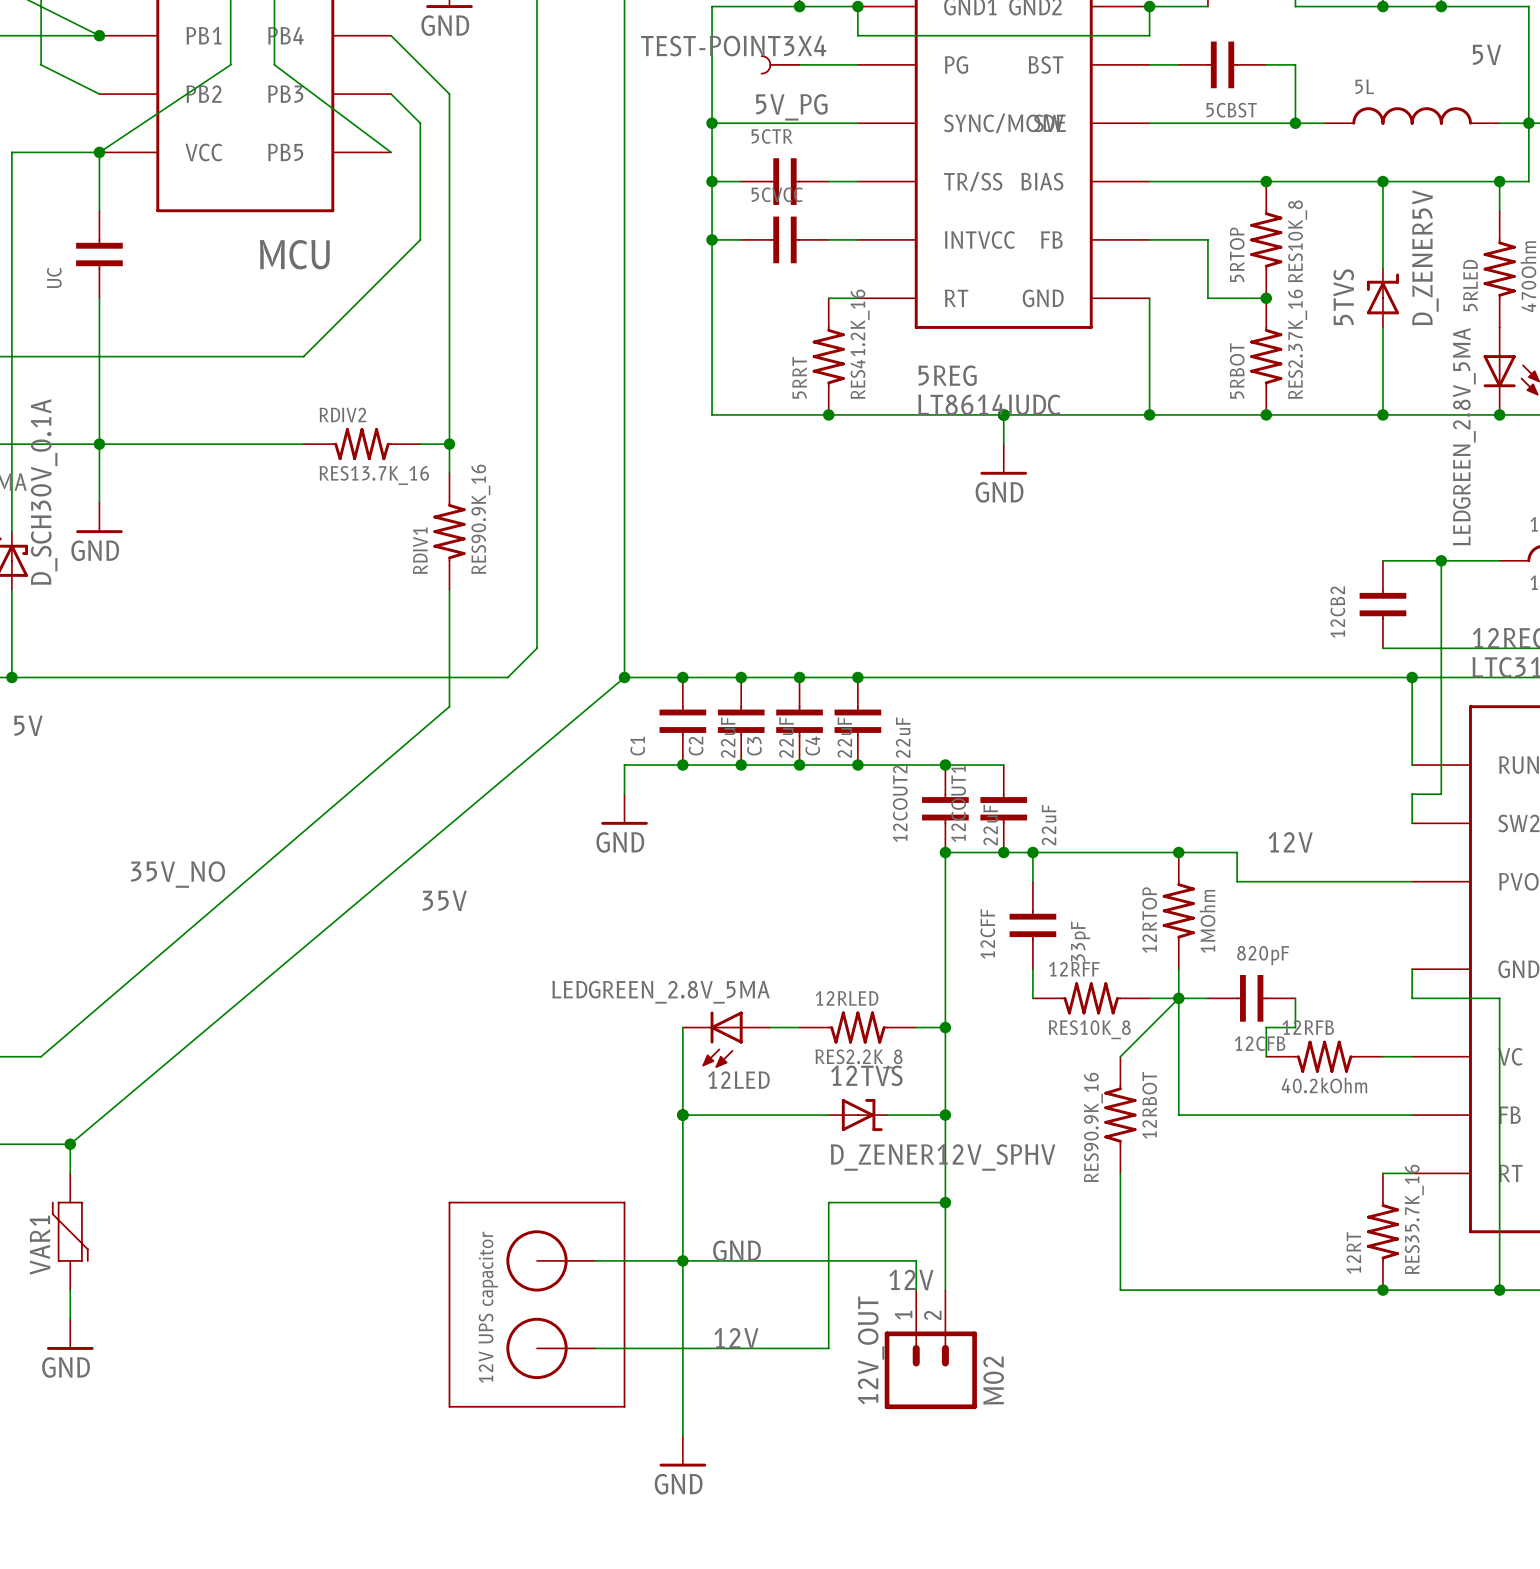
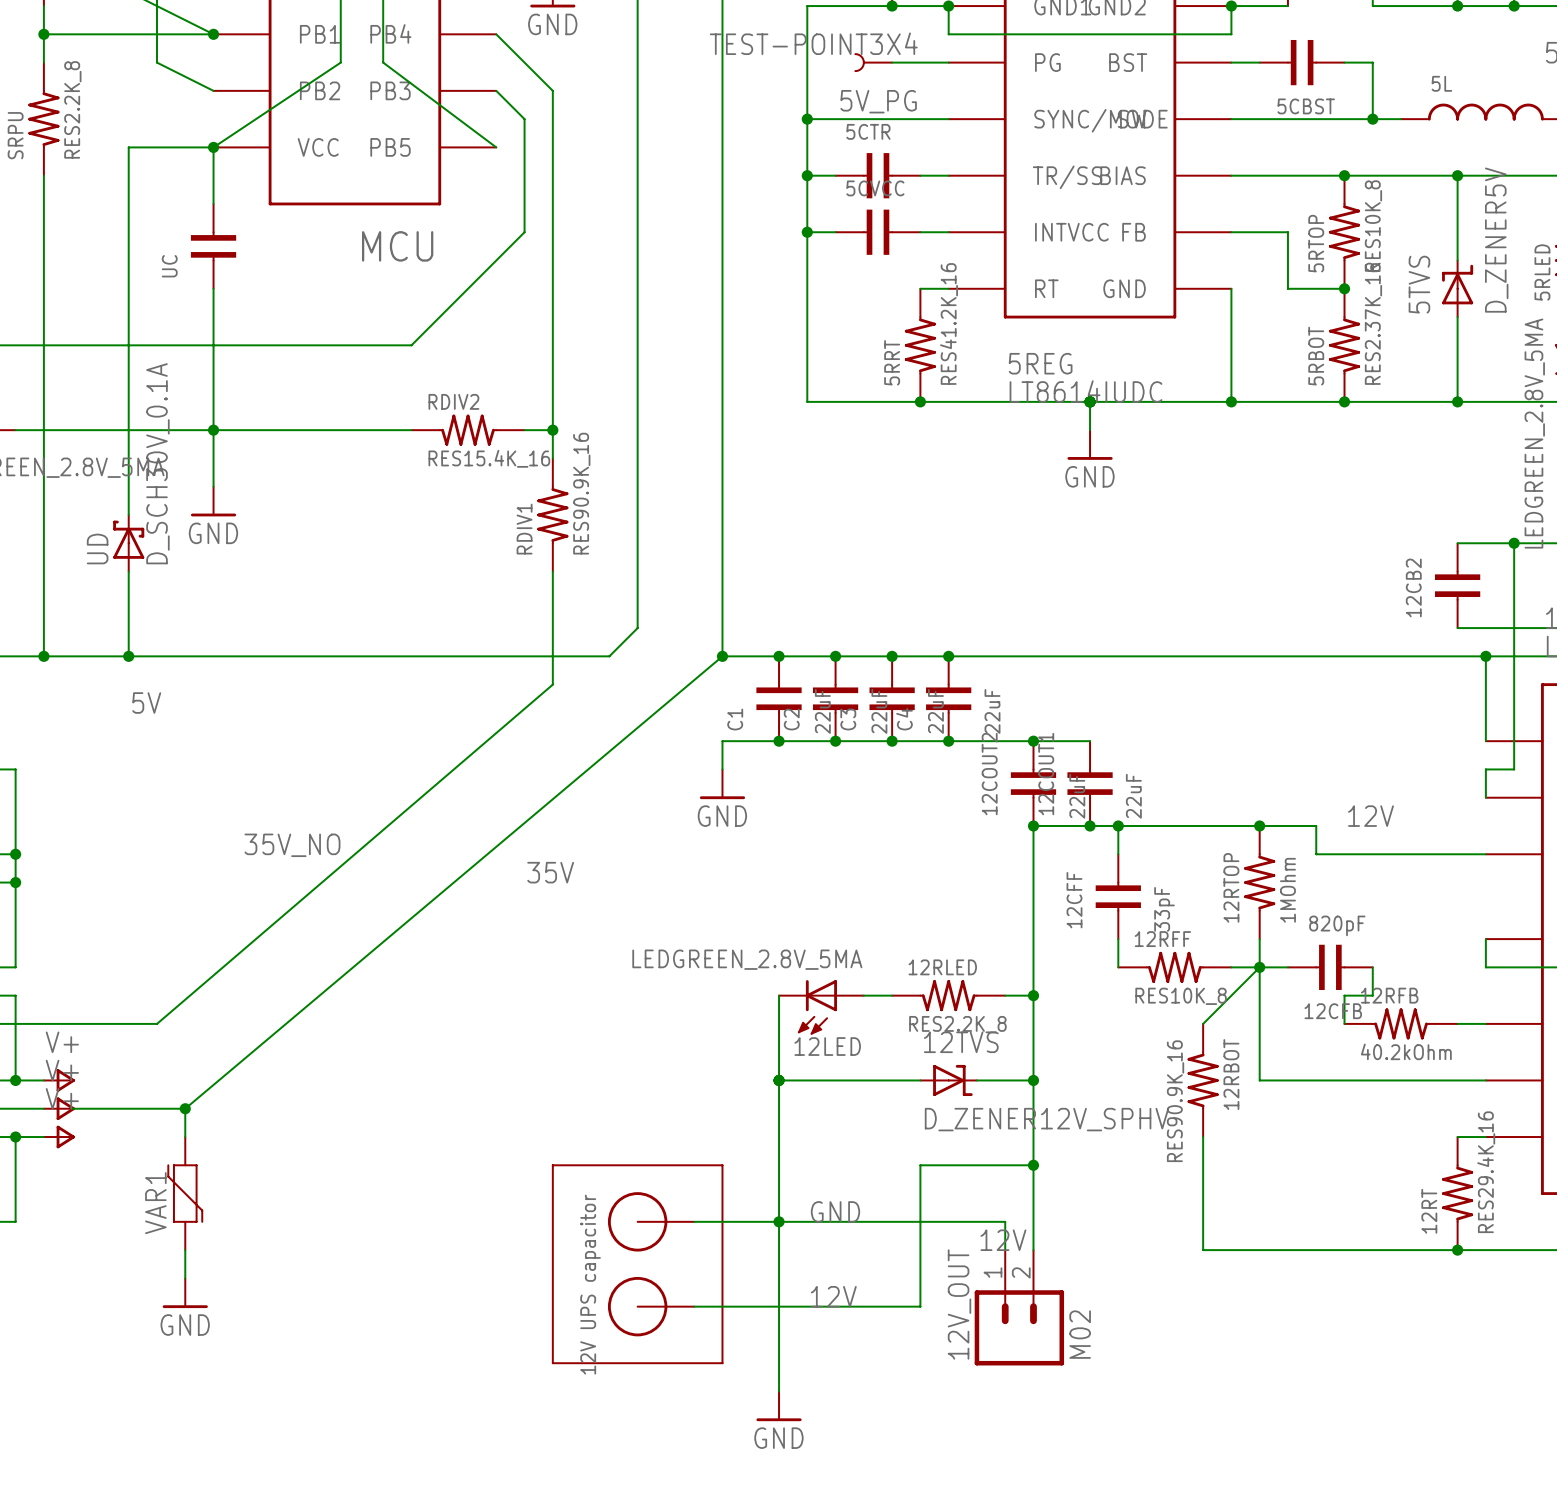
RDIV2 value: RES13.7K_16 (374, 475) -> RES15.4K_16 (489, 458)
12RT value: RES35.7K_16 (1414, 1219) -> RES29.4K_16 (1486, 1172)

